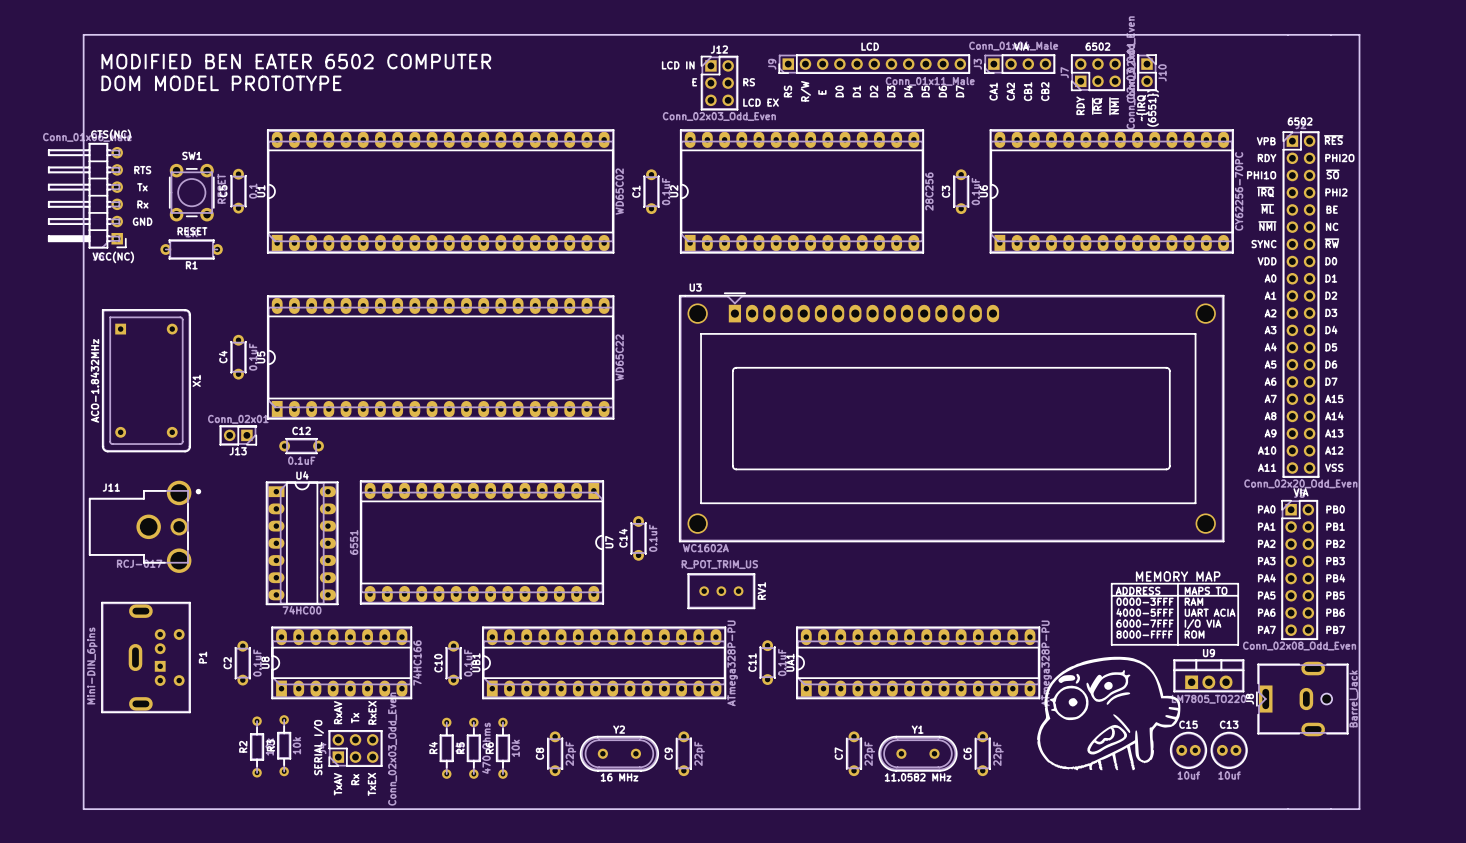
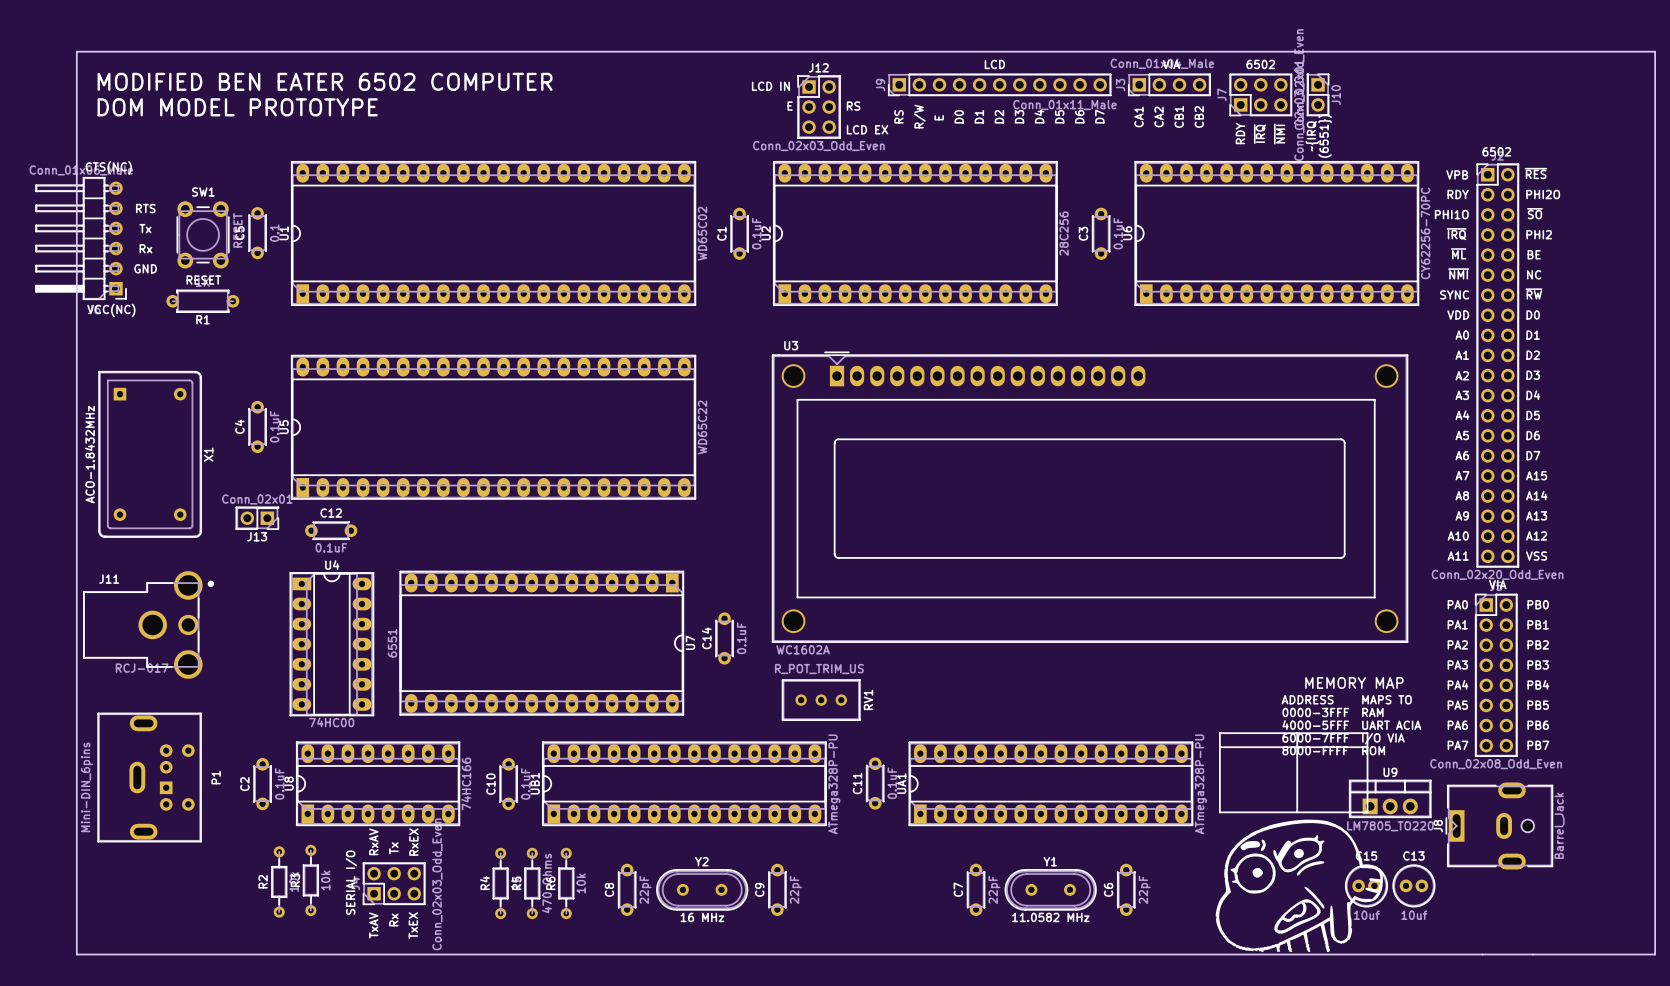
board edge: (83, 35) (1359, 34) (1359, 809) -> (76, 51) (1655, 51) (1655, 954) (1566, 954)
line: (1111, 583) (1111, 644) (1238, 644) (1238, 583) (1111, 583) -> none
line: (1177, 583) (1177, 644) -> none
line: (1111, 595) (1238, 595) -> (1219, 747) (1367, 747)
line: none -> (1219, 733) (1219, 812) (1367, 812) (1367, 733) (1219, 733)
line: none -> (1297, 733) (1297, 812)
drawing position: (1108, 713) -> (1299, 885)

